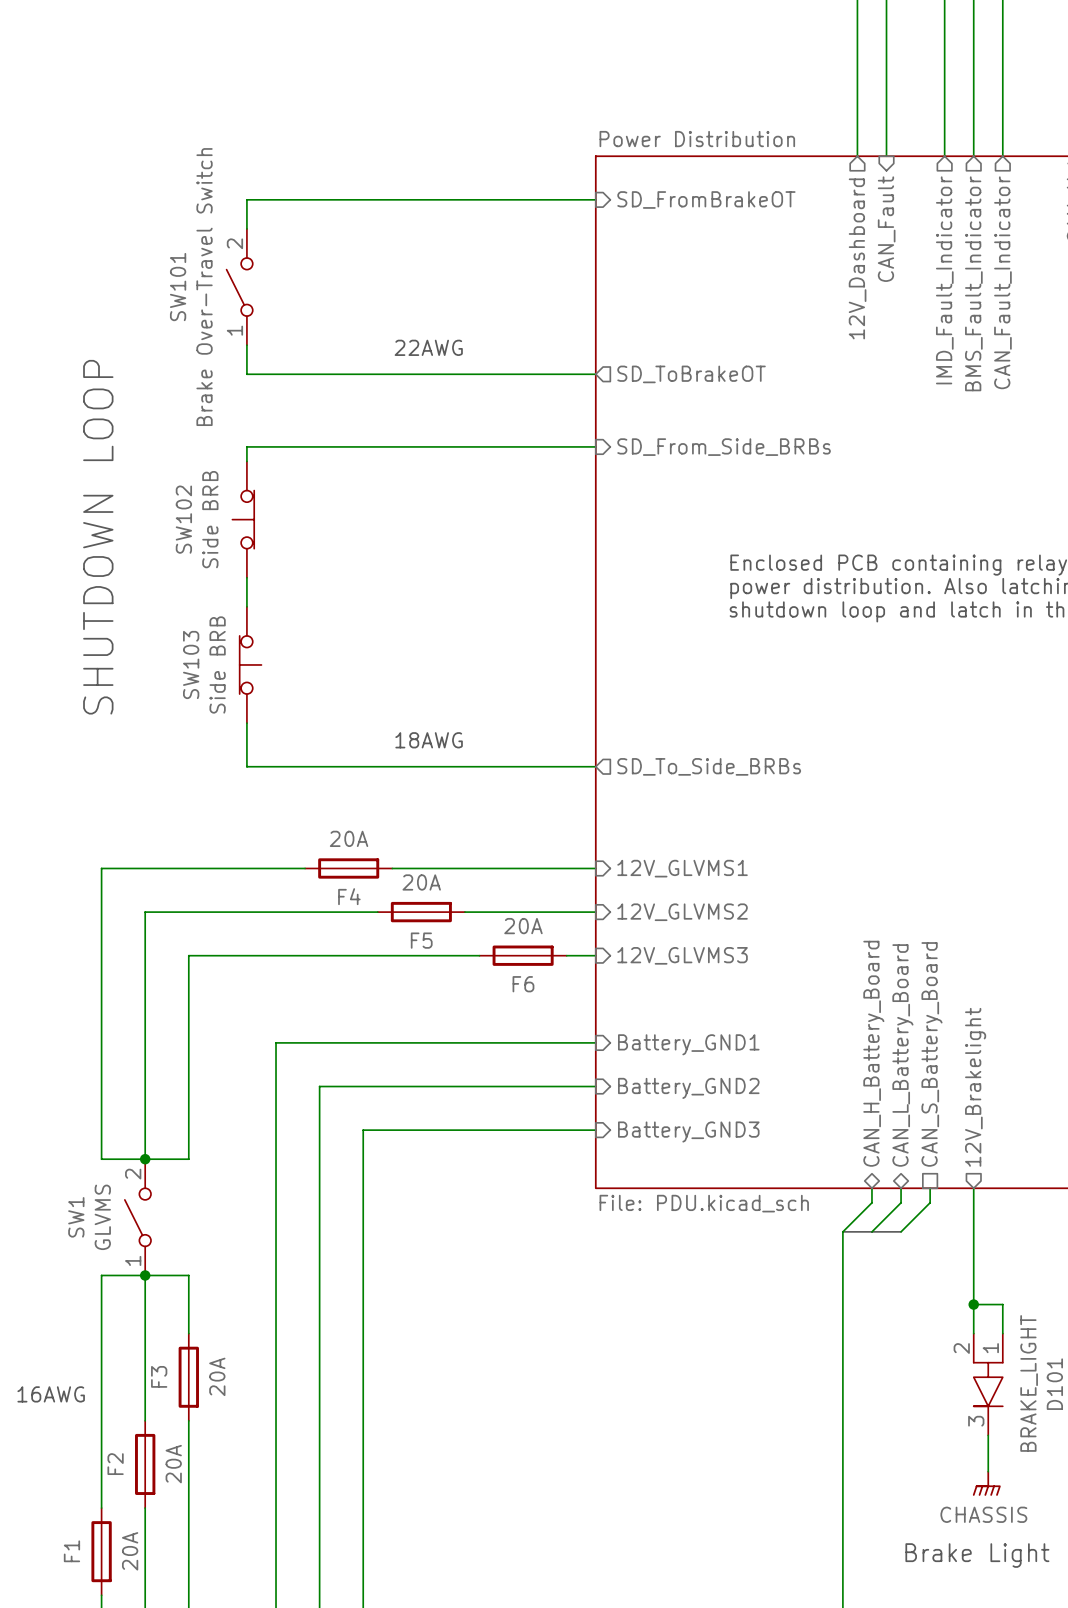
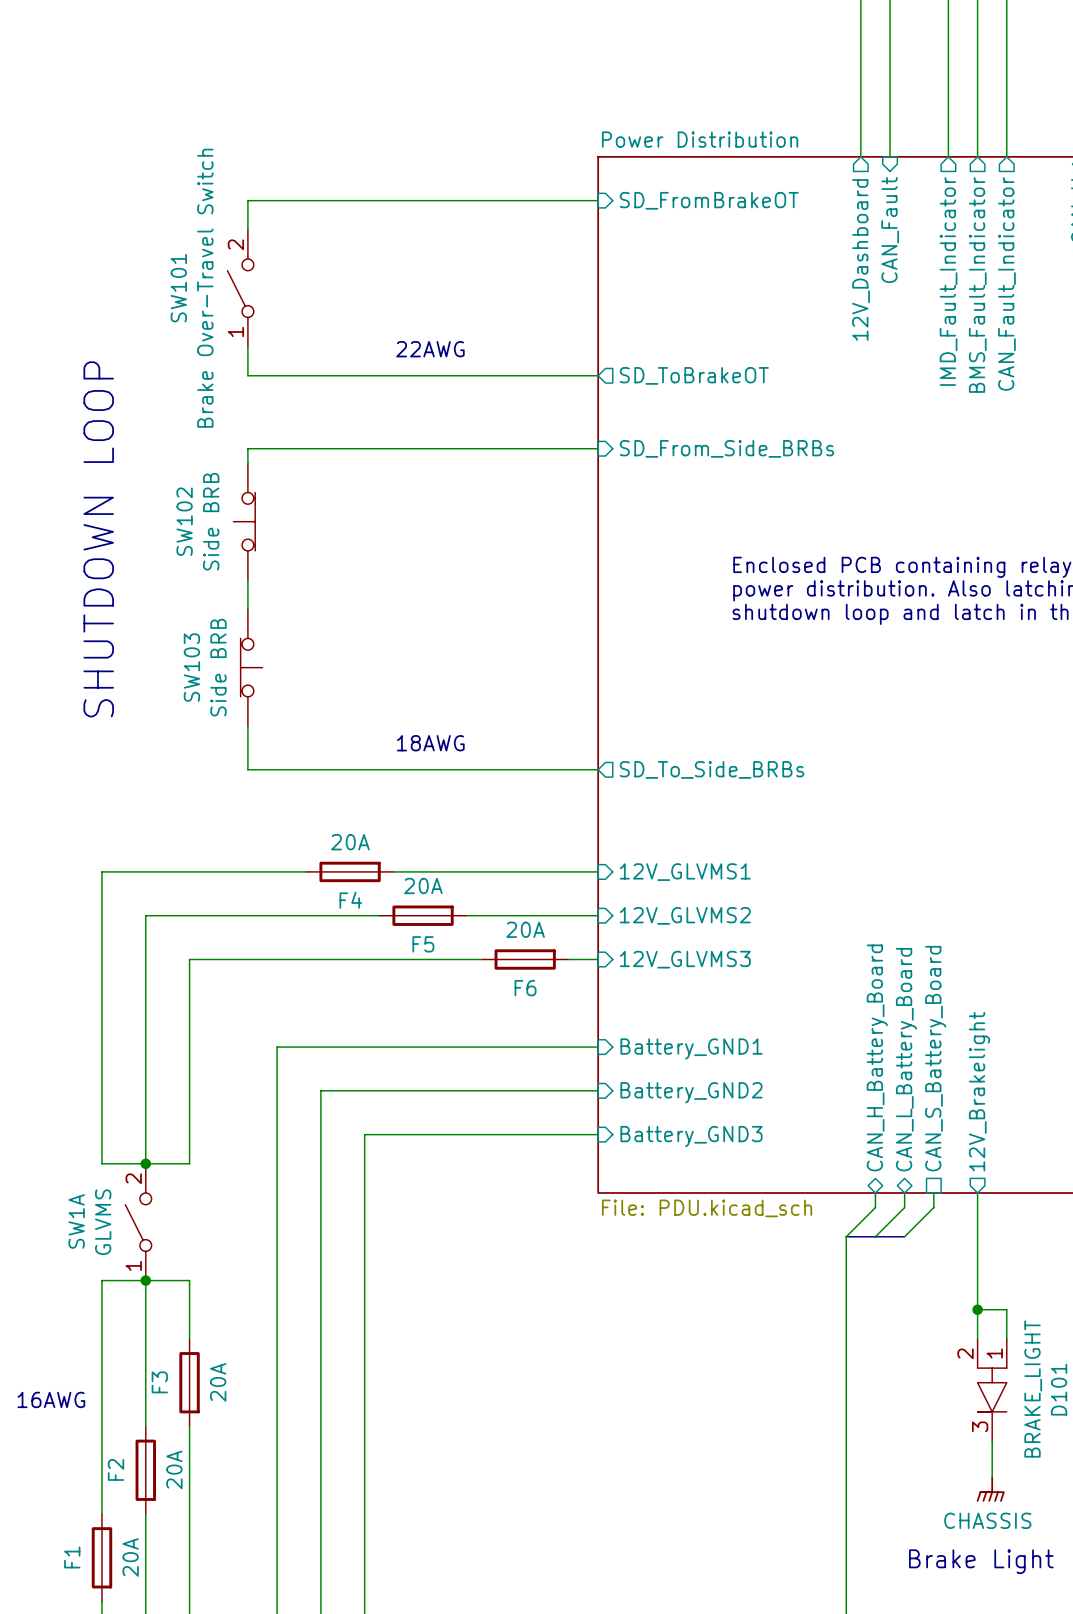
SW1 name: SW1 (76, 1217) -> SW1A (76, 1221)

